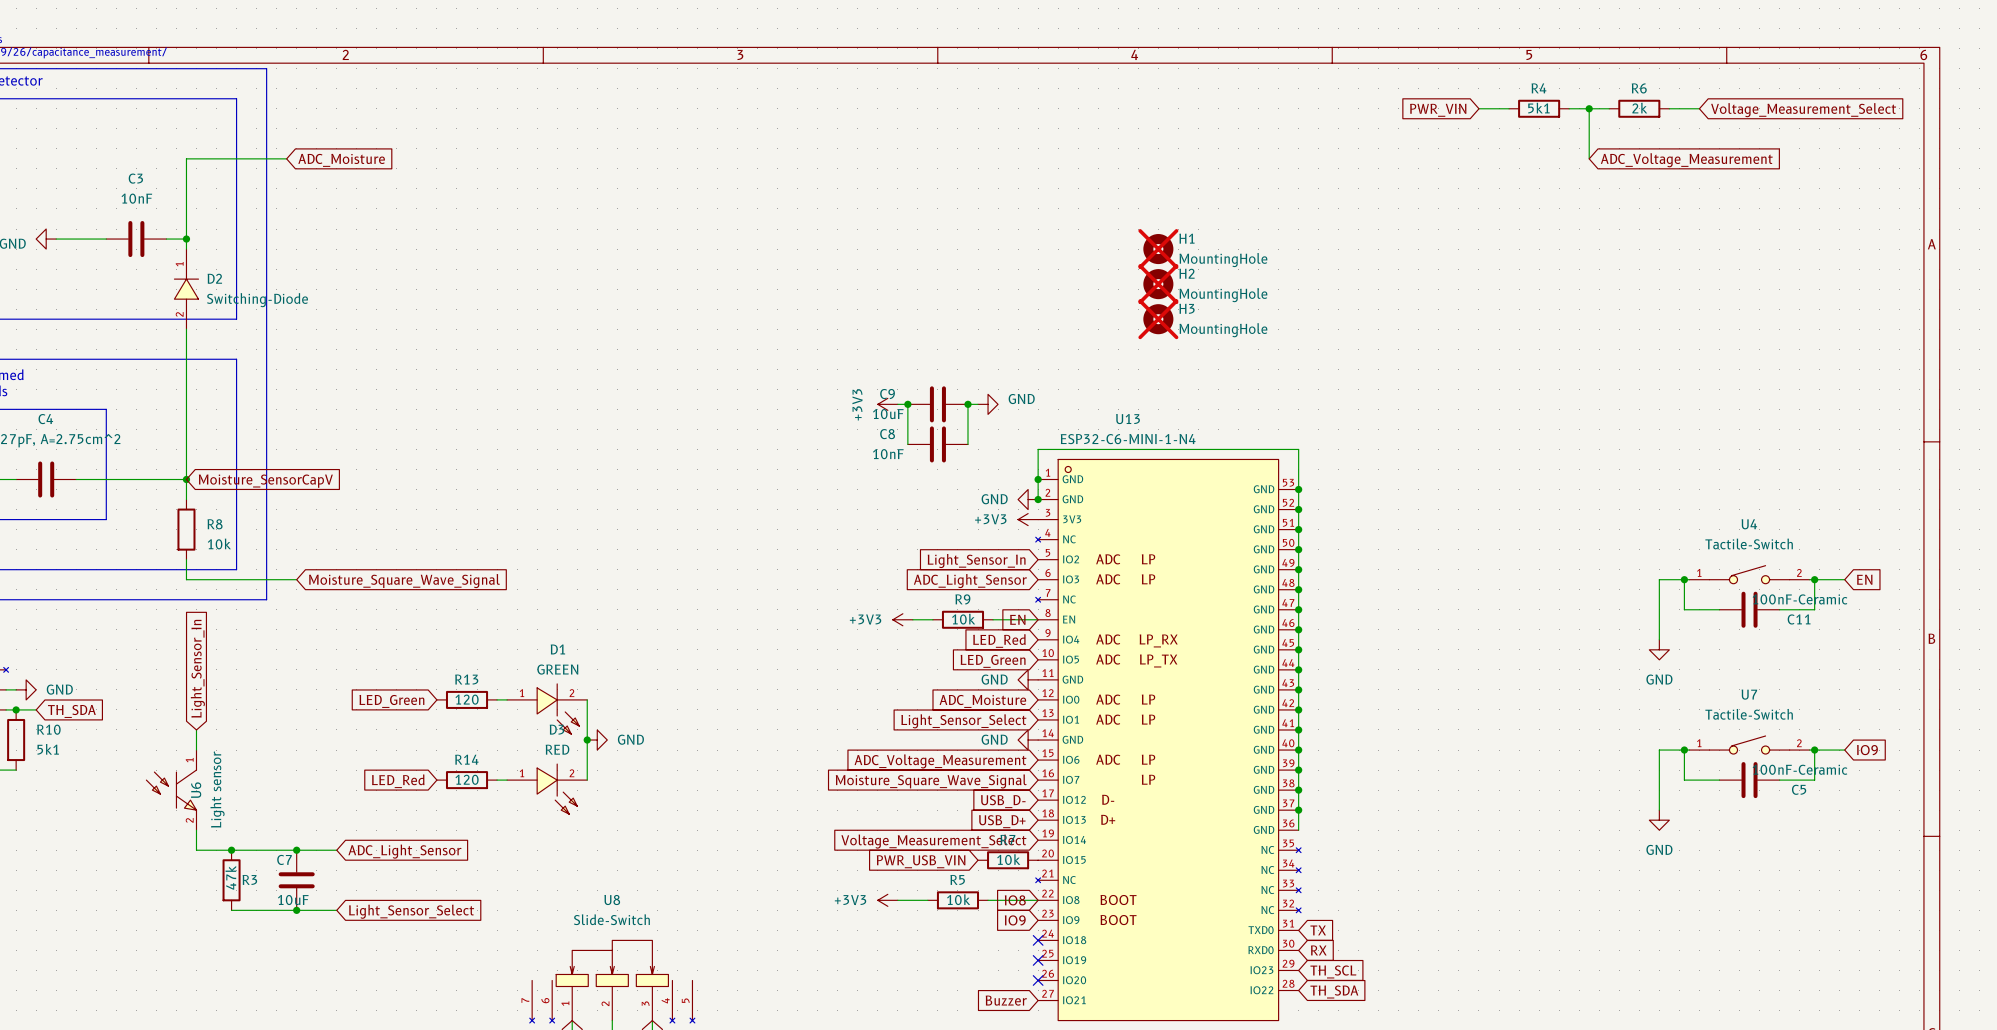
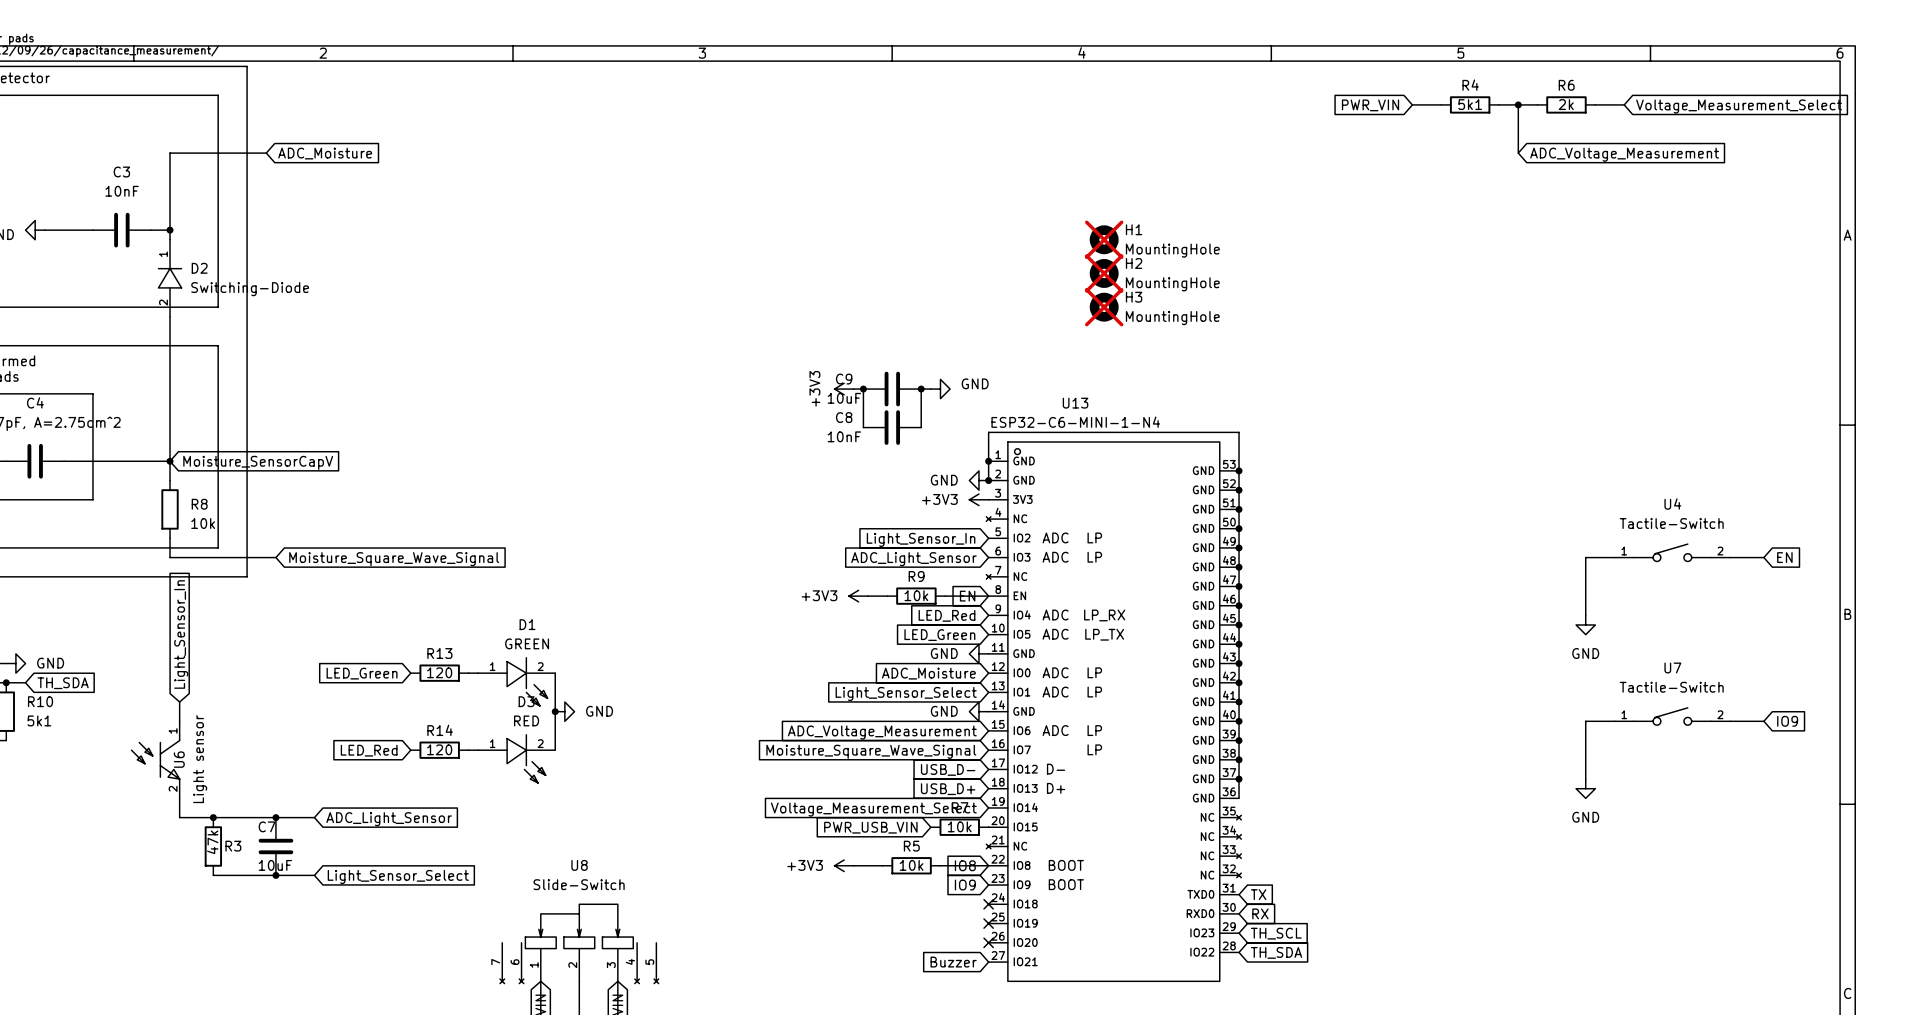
wire: (1684, 579) (1684, 609) (1719, 609) -> none
junction: (1684, 579) -> none
wire: (1814, 579) (1814, 609) (1779, 609) -> none
junction: (1814, 579) -> none
C11: 100nF-Ceramic (1749, 609) -> none
wire: (1684, 750) (1684, 780) (1719, 780) -> none
junction: (1684, 750) -> none
wire: (1814, 750) (1814, 780) (1779, 780) -> none
junction: (1814, 750) -> none
C5: 100nF-Ceramic (1749, 780) -> none

